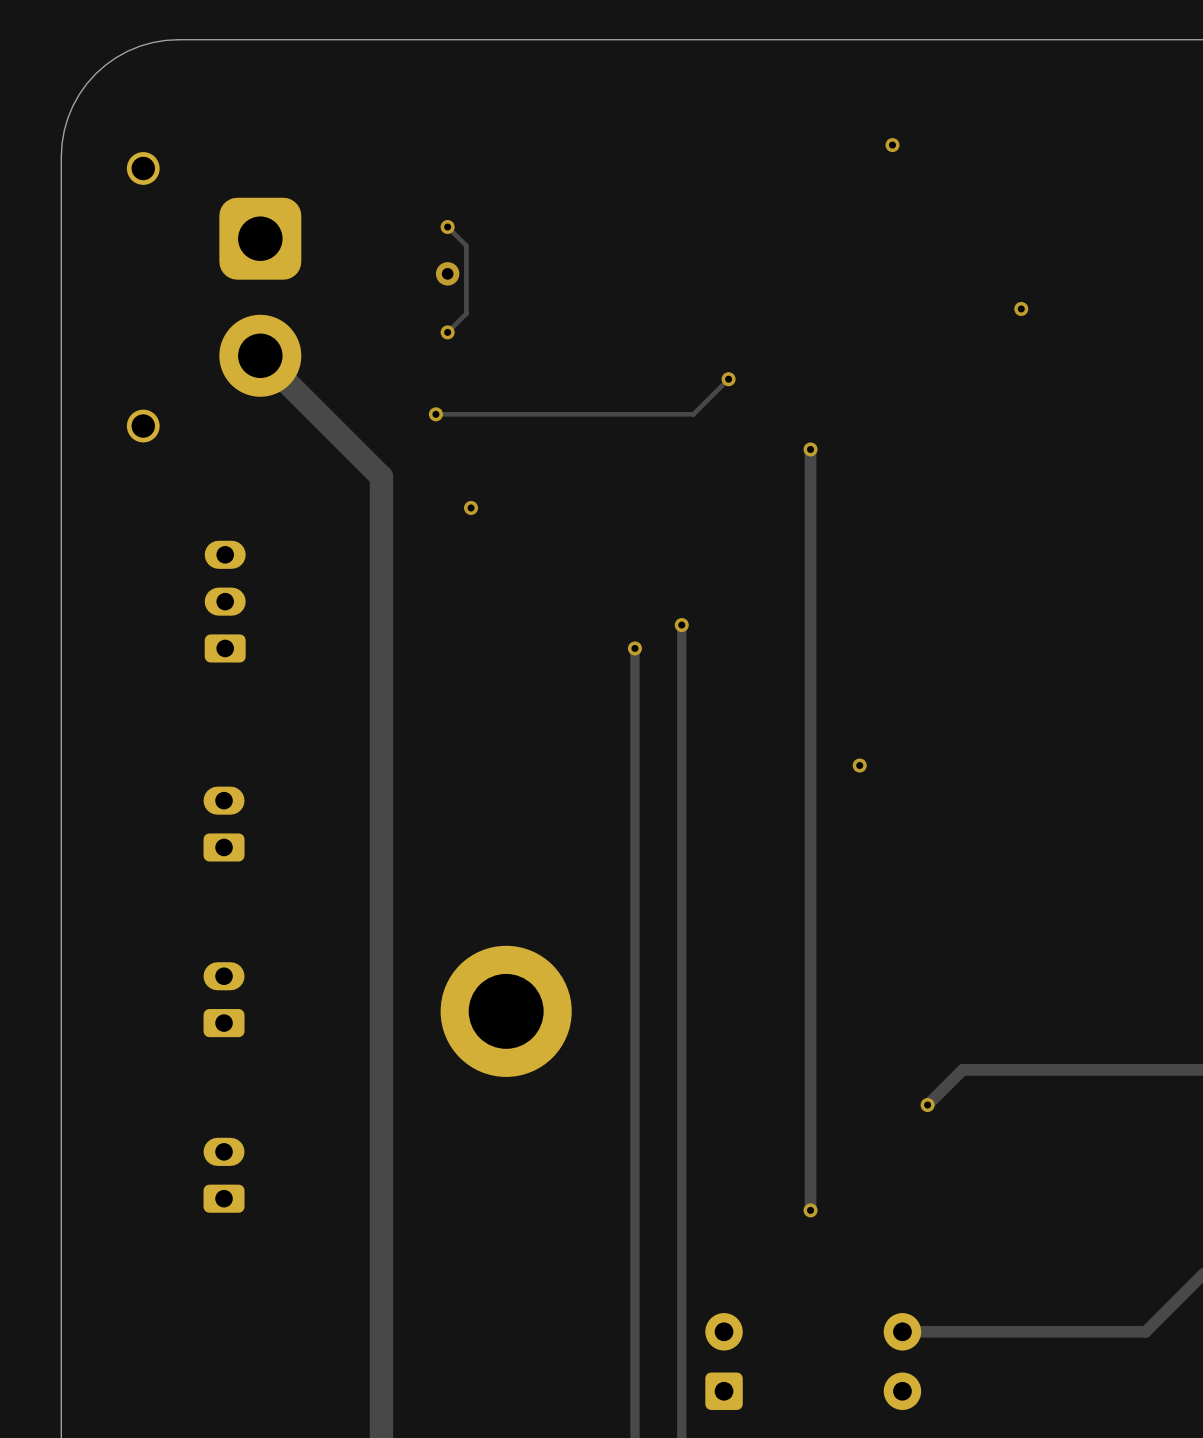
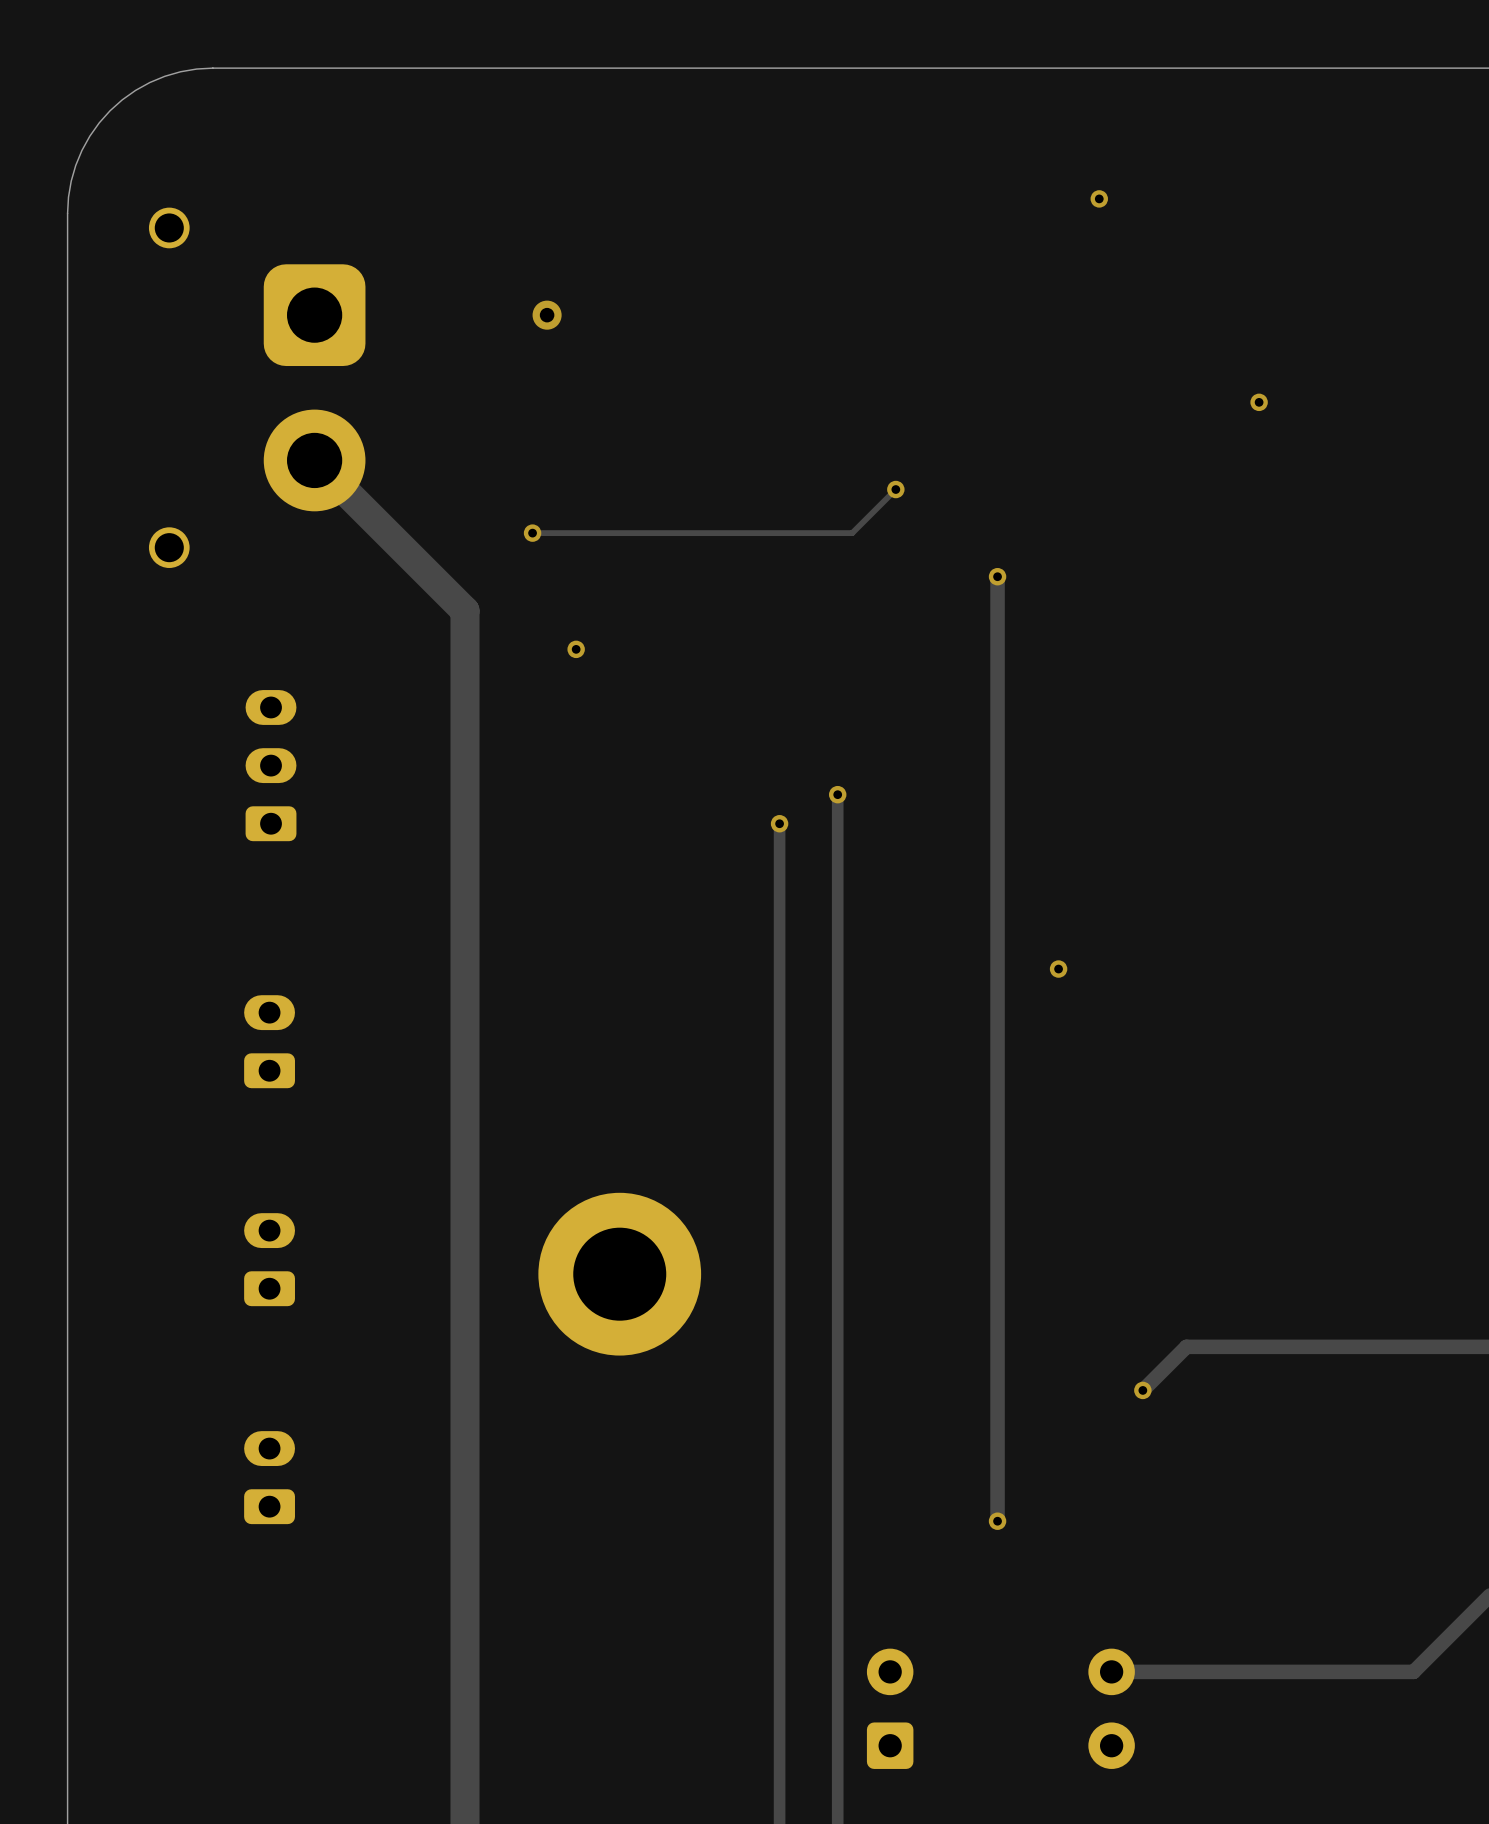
track: (447, 227) (466, 245) (466, 313) (447, 332) -> none
via: (447, 227) -> none
via position: (447, 273) -> (547, 315)
via: (447, 332) -> none

